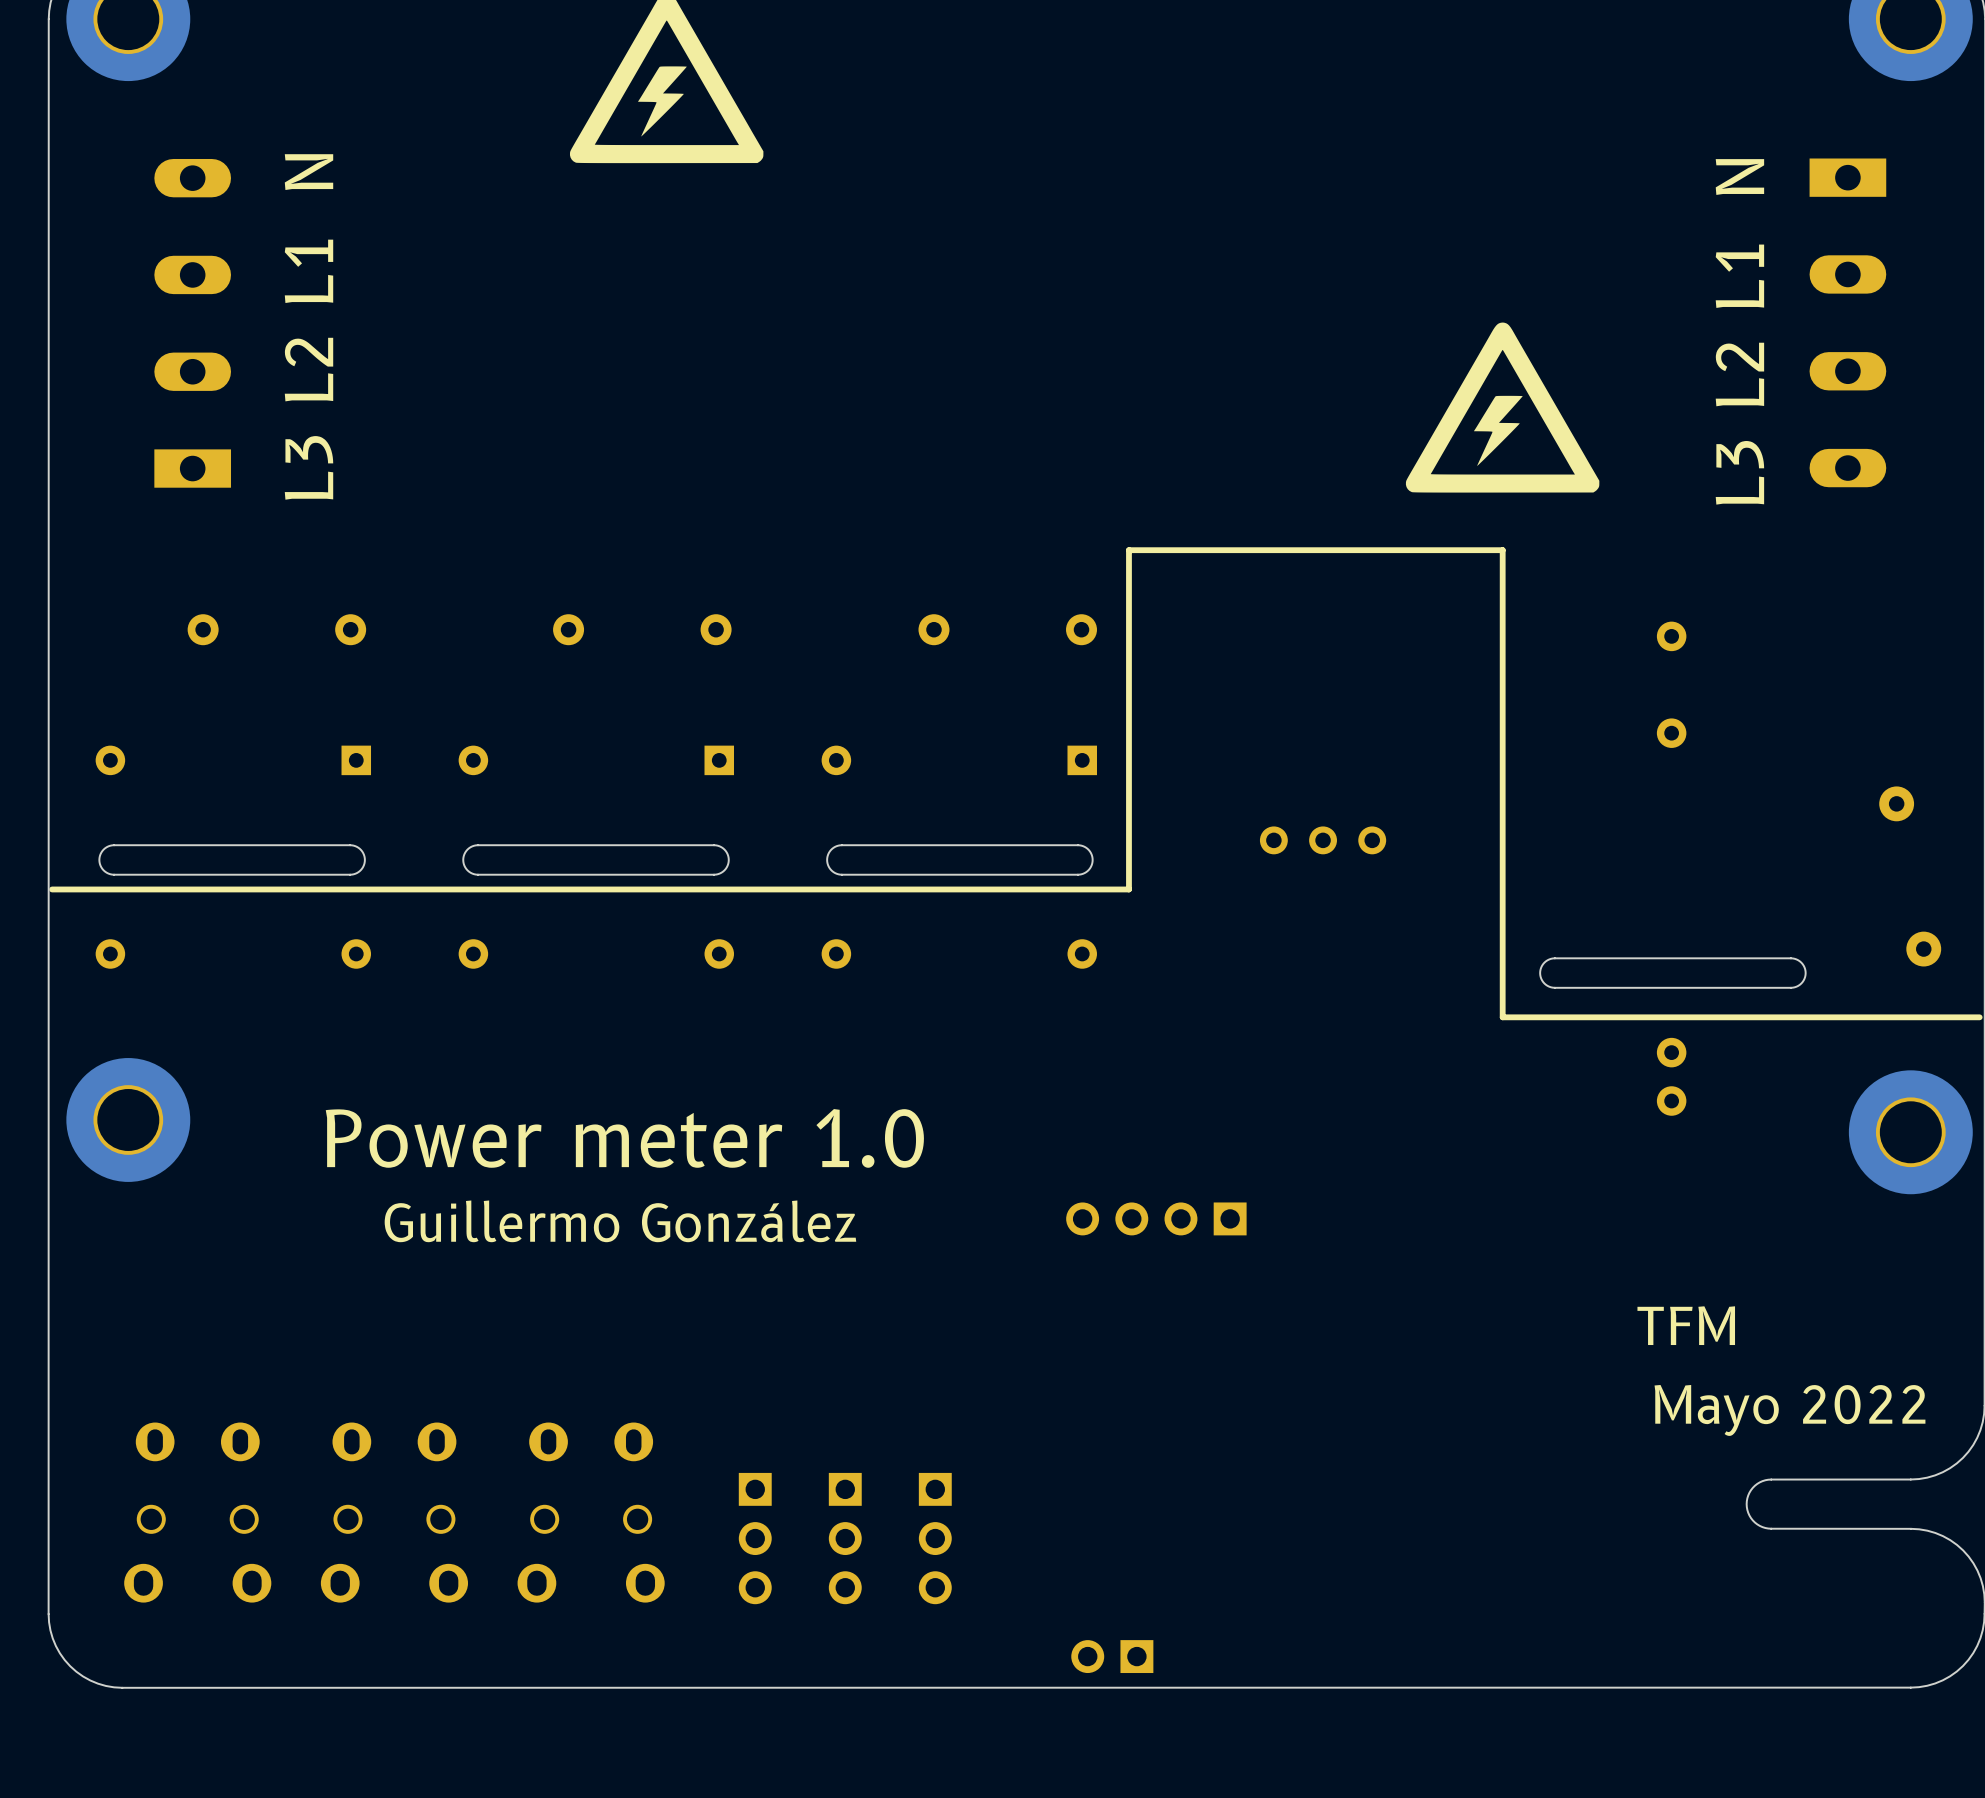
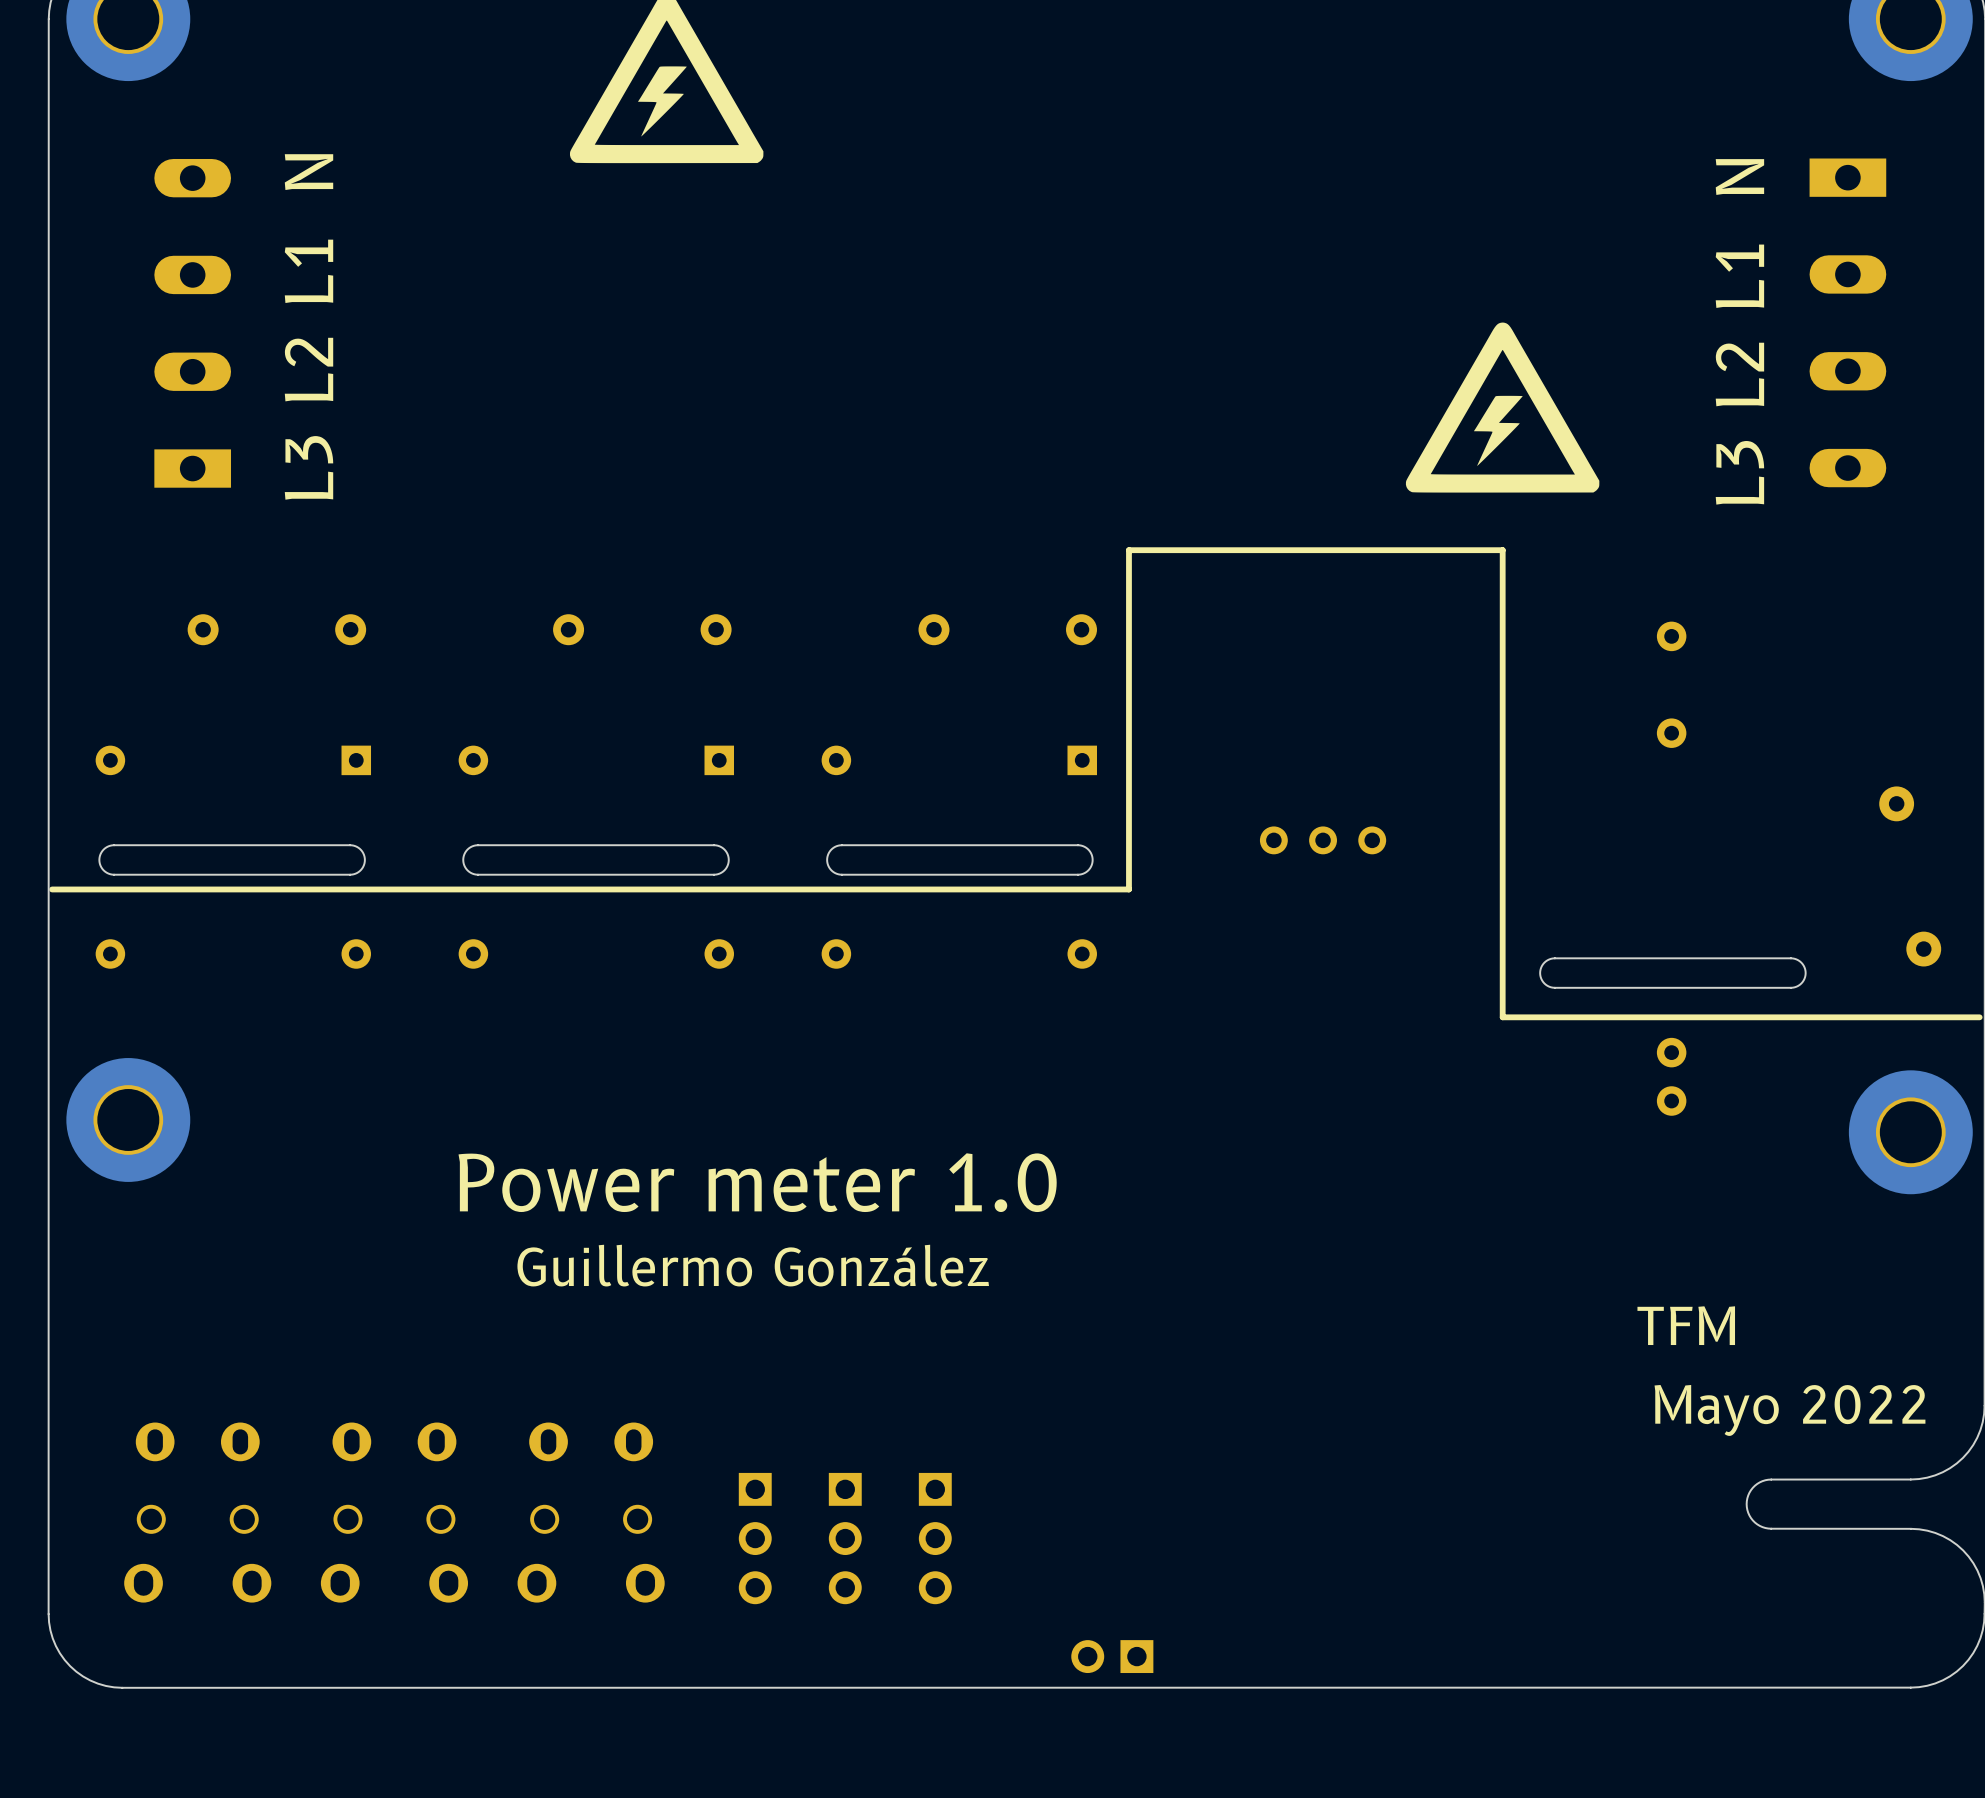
text position: Power meter 1.0 (624, 1138) -> Power meter 1.0 (757, 1182)
part: (1156, 1218) -> none
text position: Guillermo González (620, 1221) -> Guillermo González (753, 1265)

